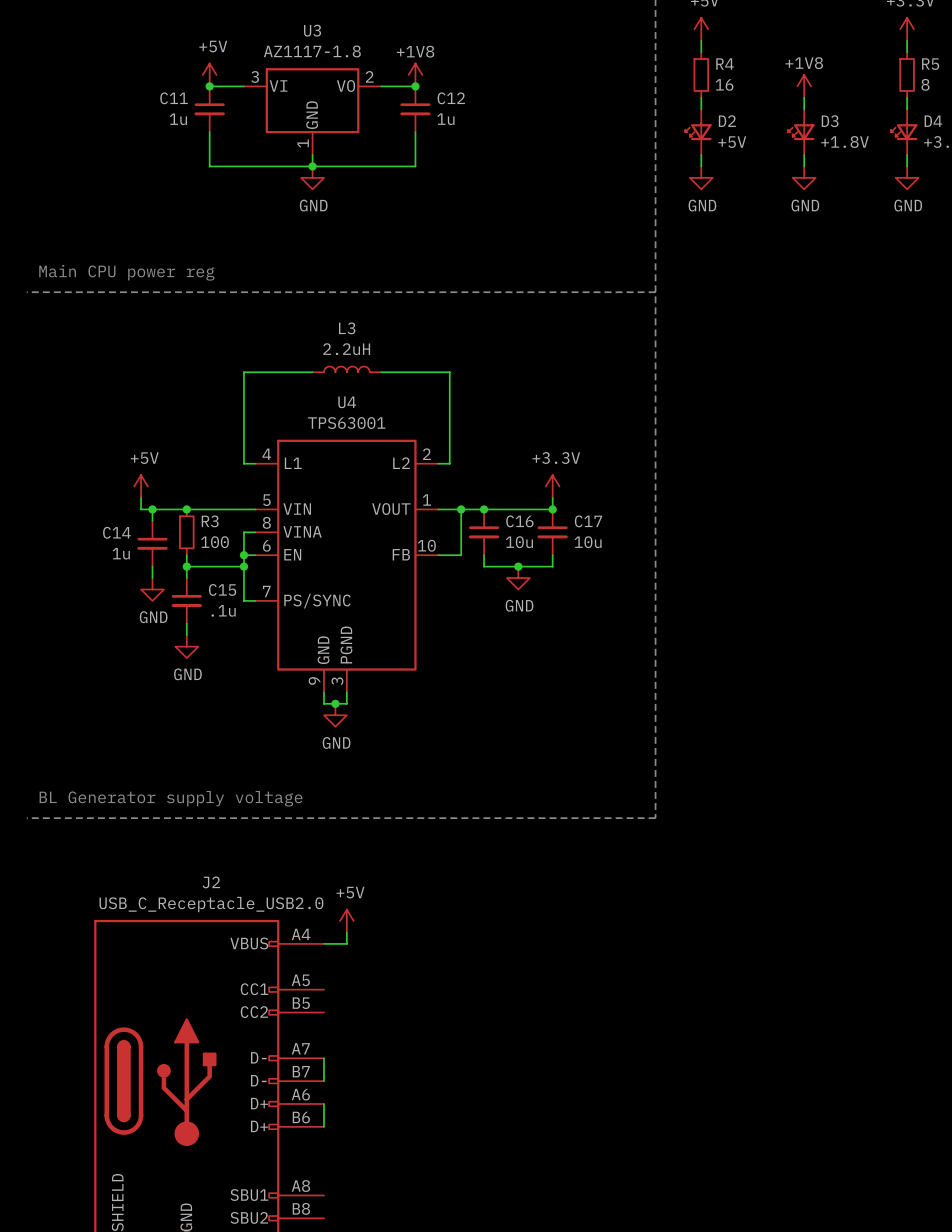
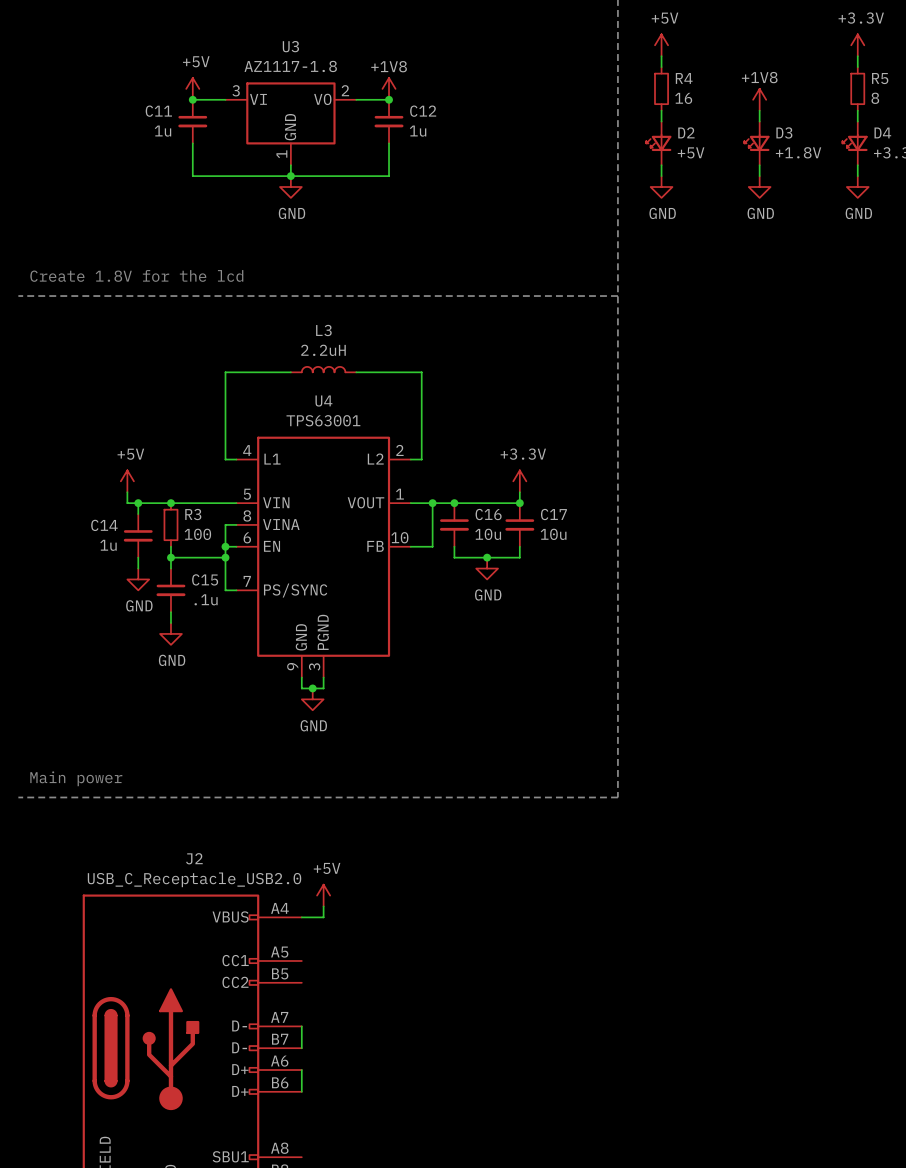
text: Main CPU power reg (126, 272) -> Create 1.8V for the lcd (136, 275)
text: BL Generator supply voltage (171, 798) -> Main power (76, 778)

